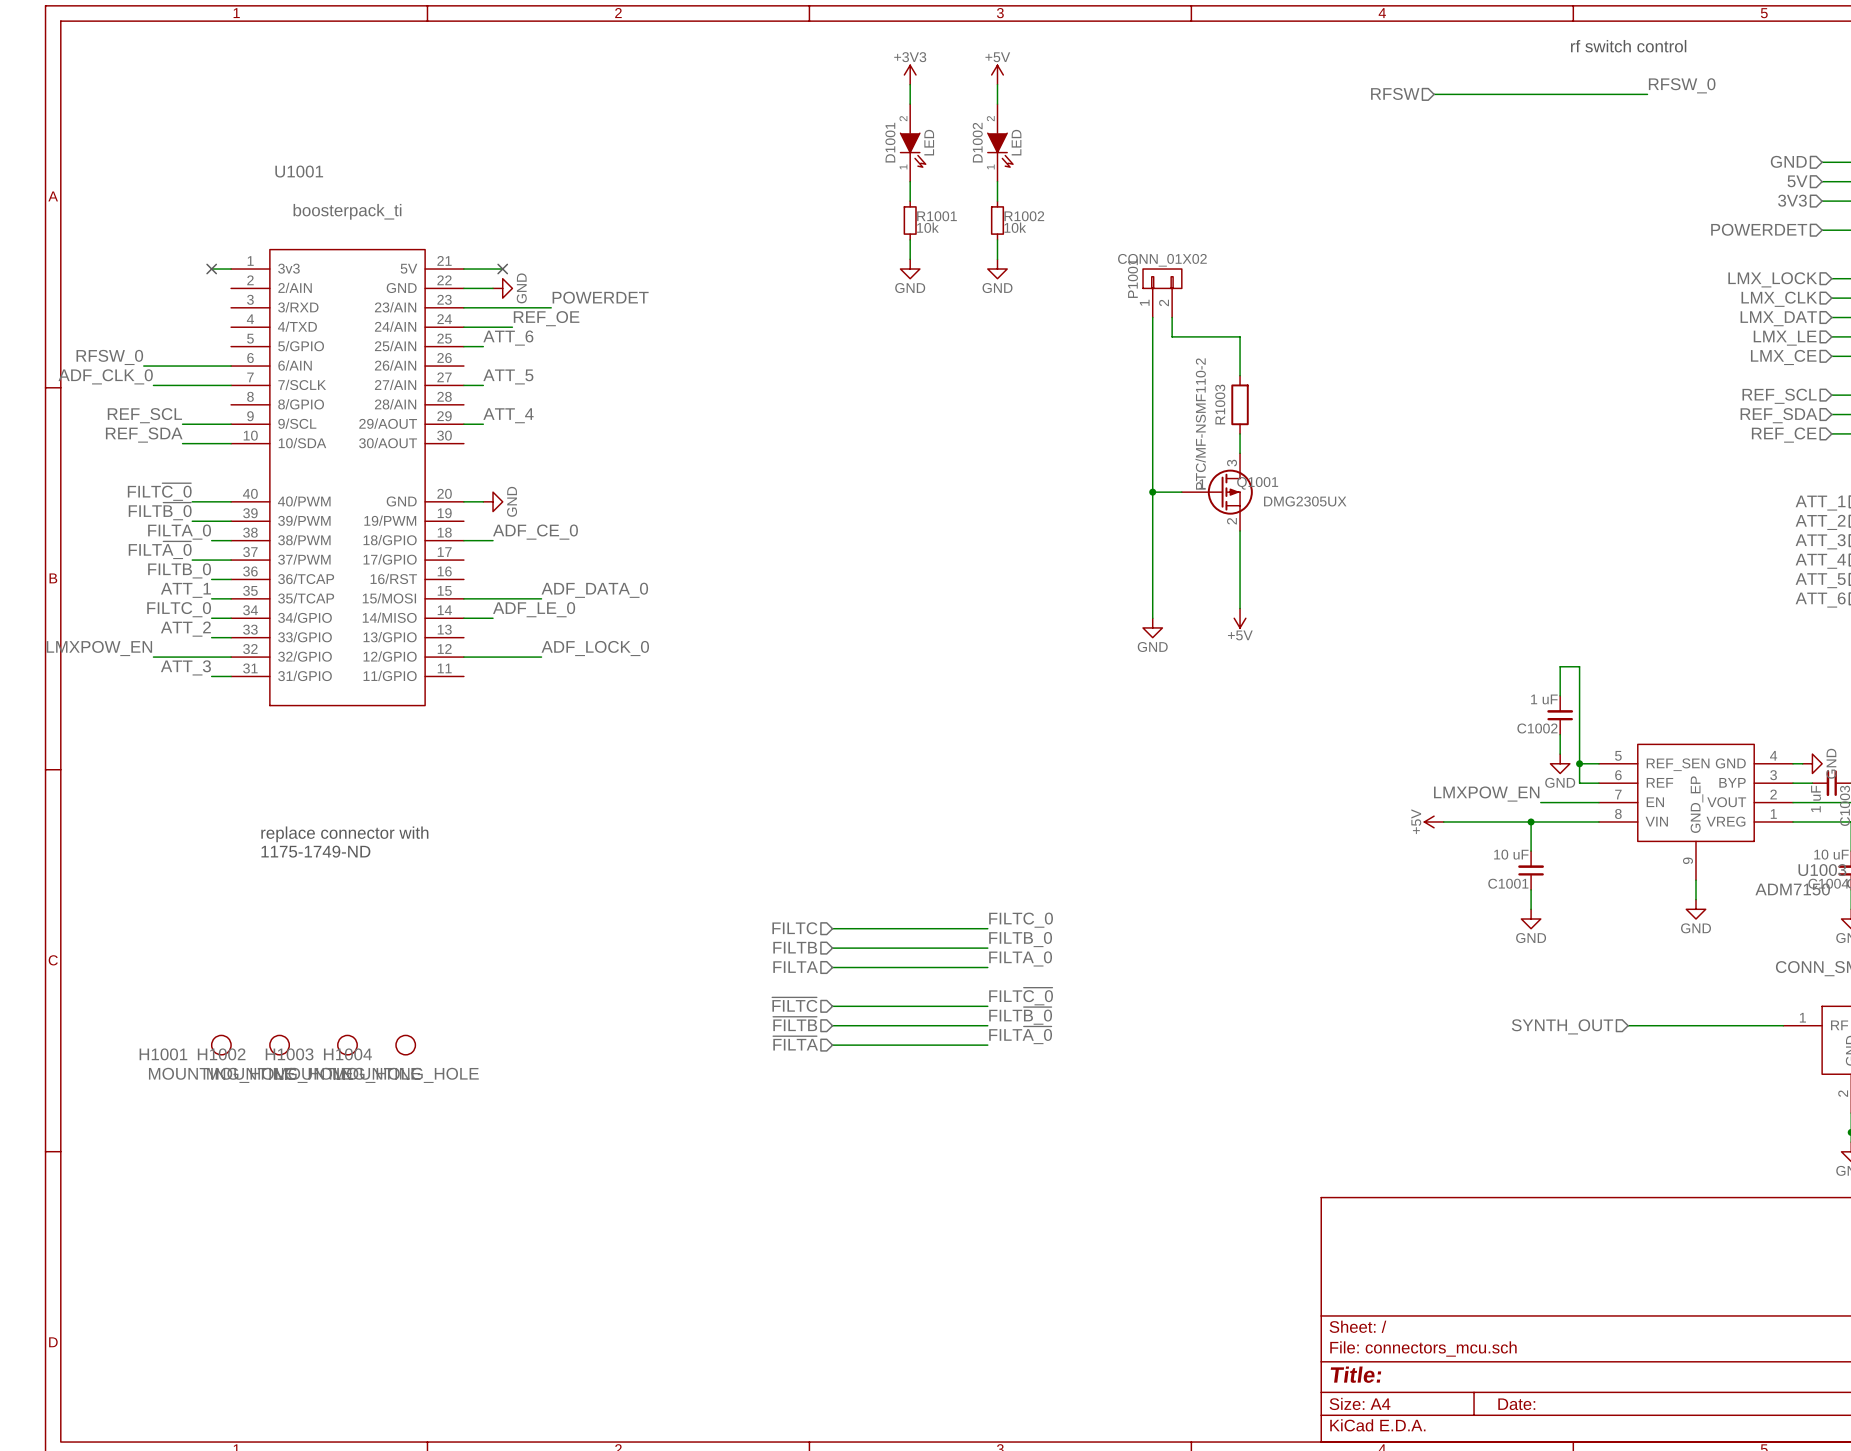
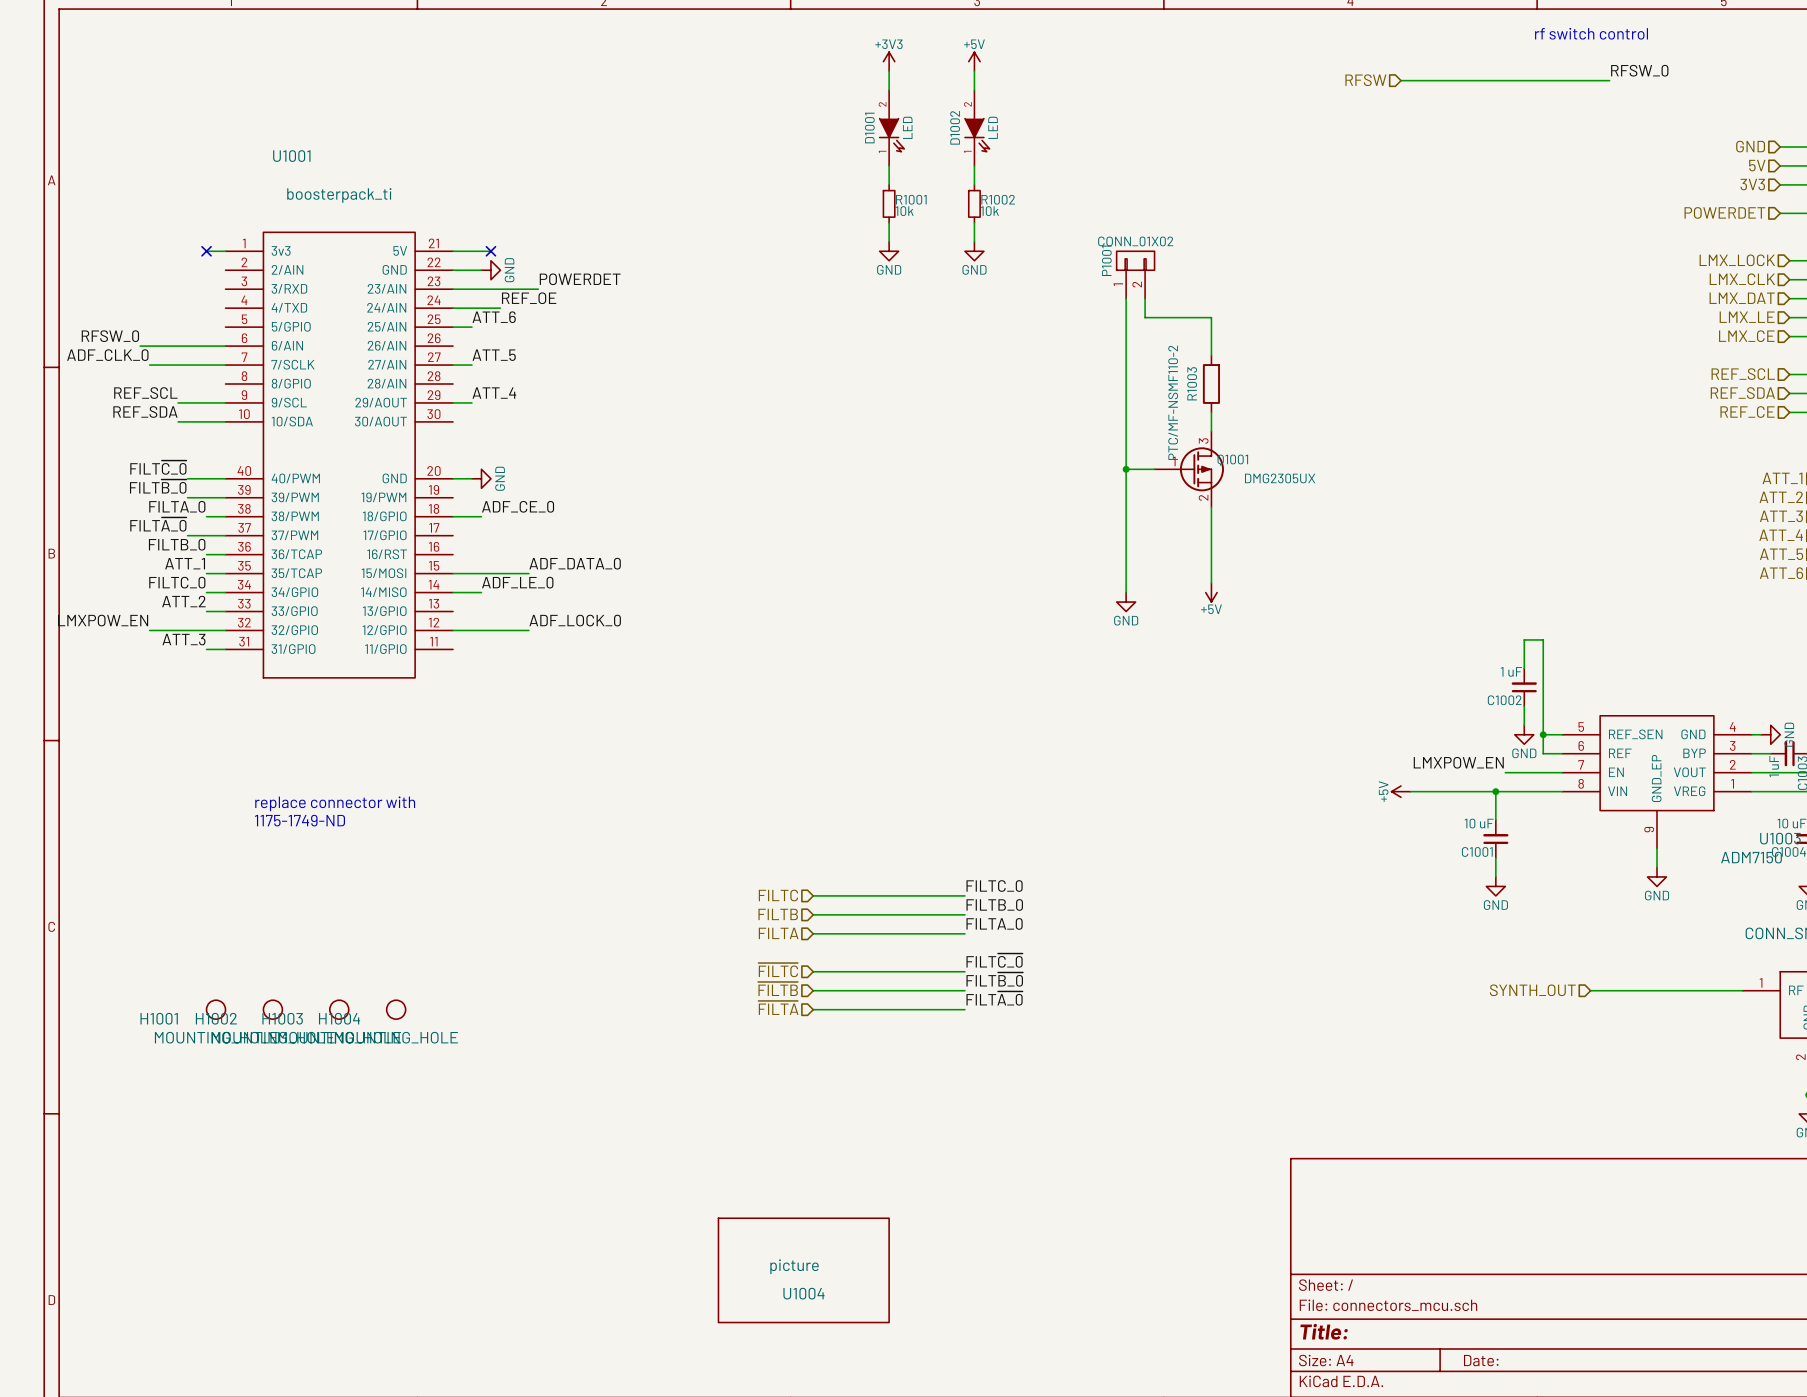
U1004: none -> picture (803, 1270)

